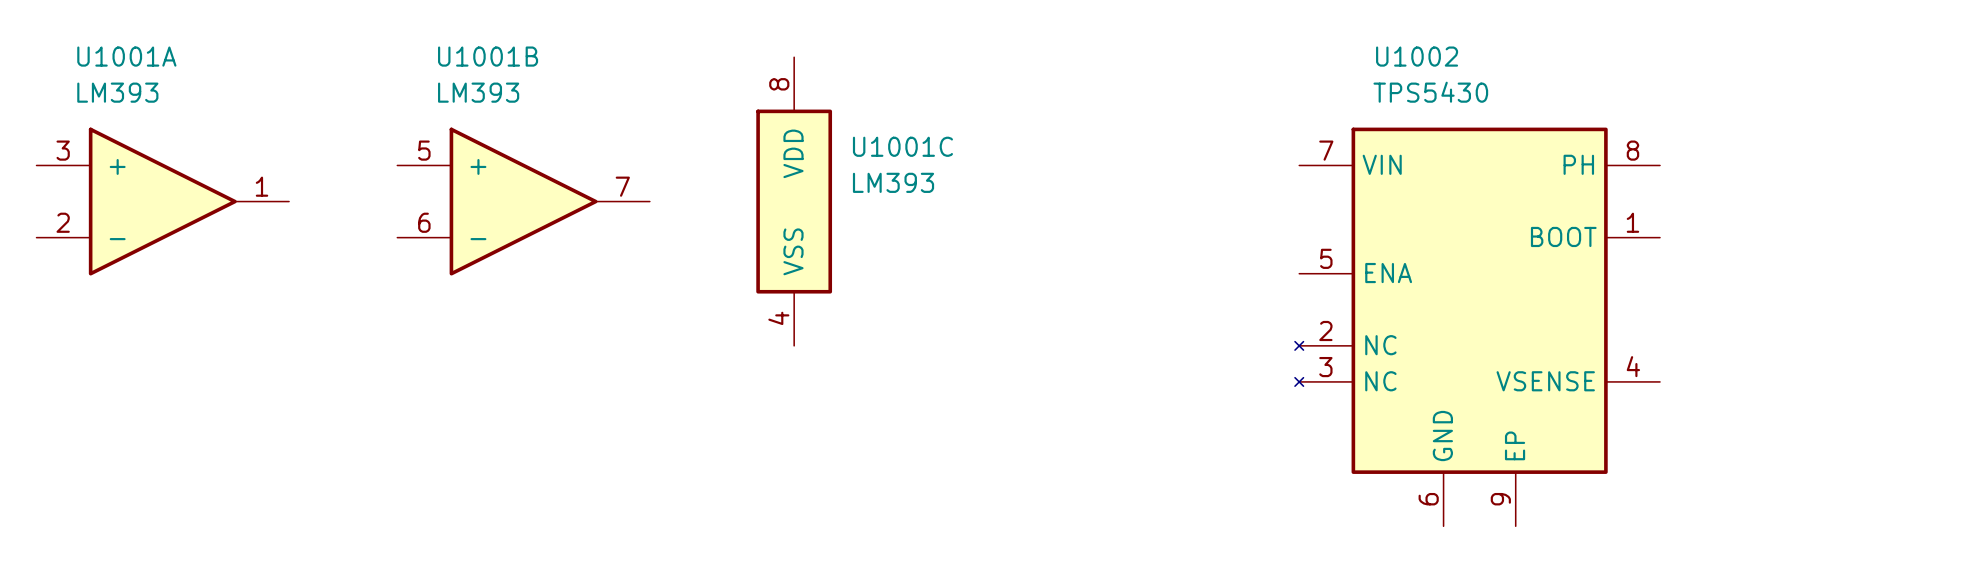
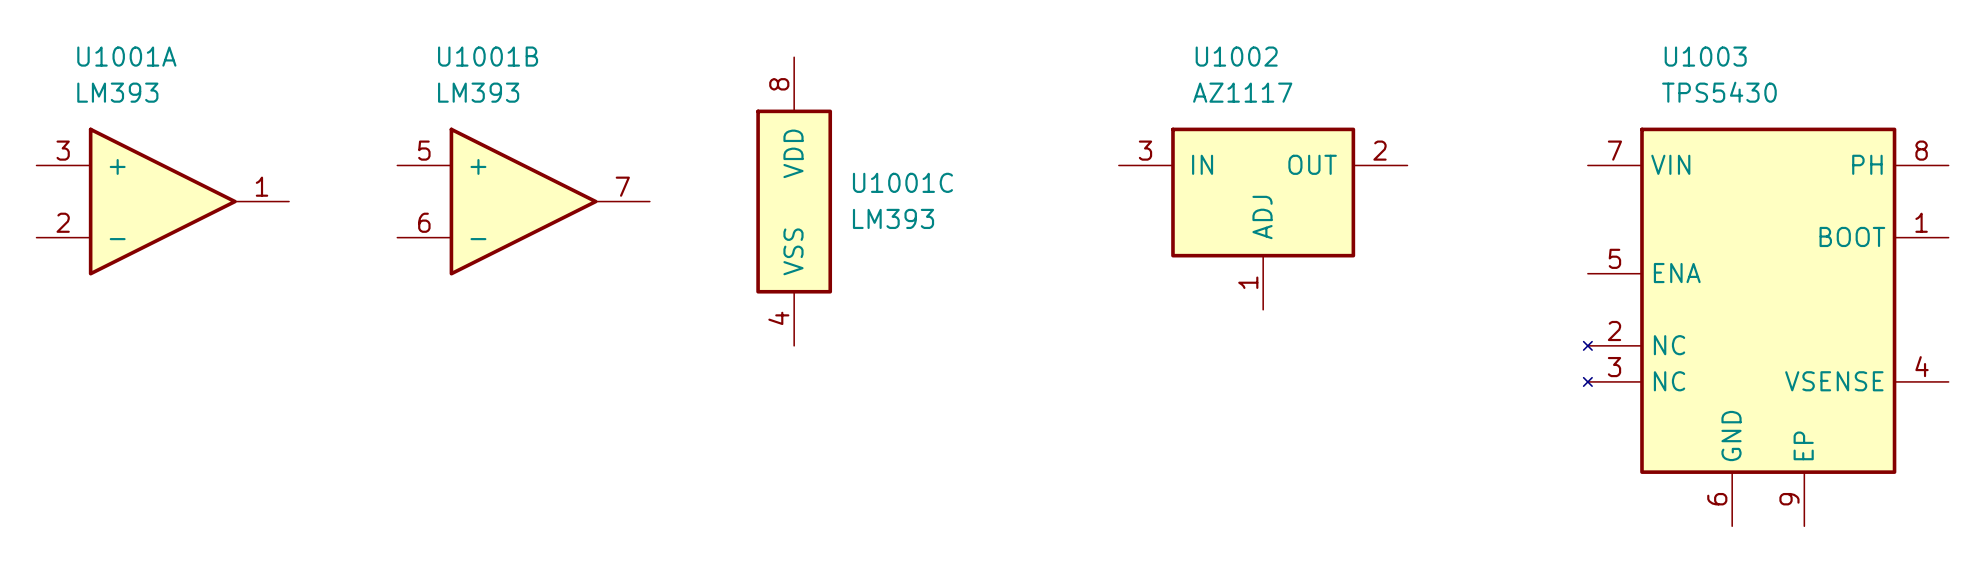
U1002 name position: U1002 (1417, 56) -> U1002 (1236, 56)
U1002 value: TPS5430 (1430, 92) -> AZ1117 (1242, 92)
U1002 symbol: [1294, 127, 1661, 527] -> [1118, 127, 1408, 310]
U1001C name position: U1001C (902, 146) -> U1001C (902, 182)
U1001C value position: LM393 (893, 182) -> LM393 (893, 218)
U1003: none -> TPS5430 (1766, 326)

